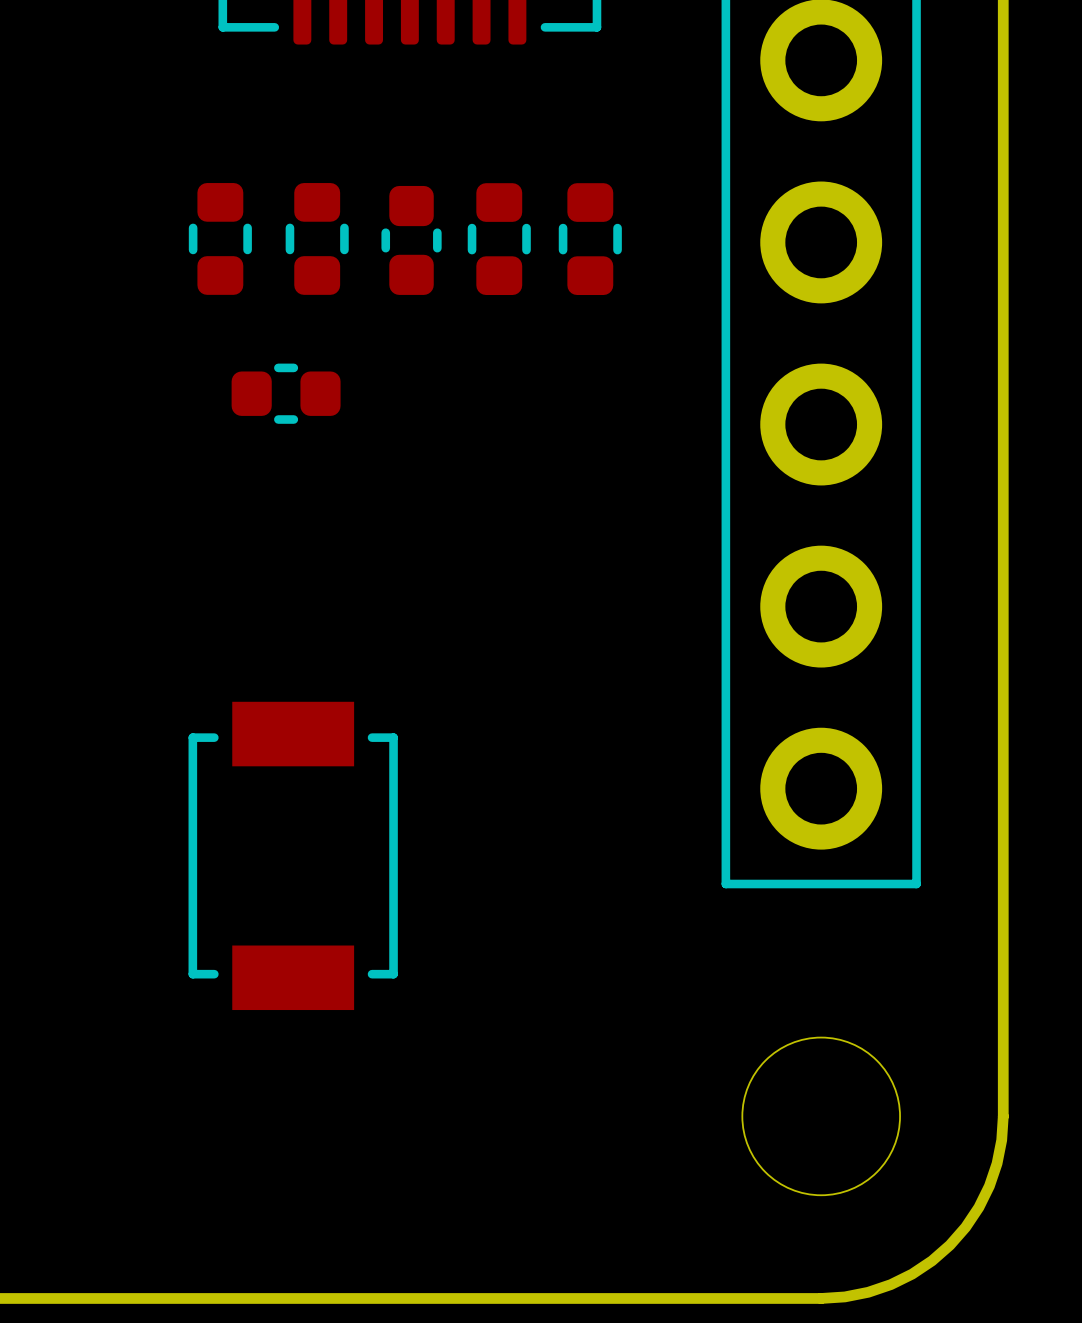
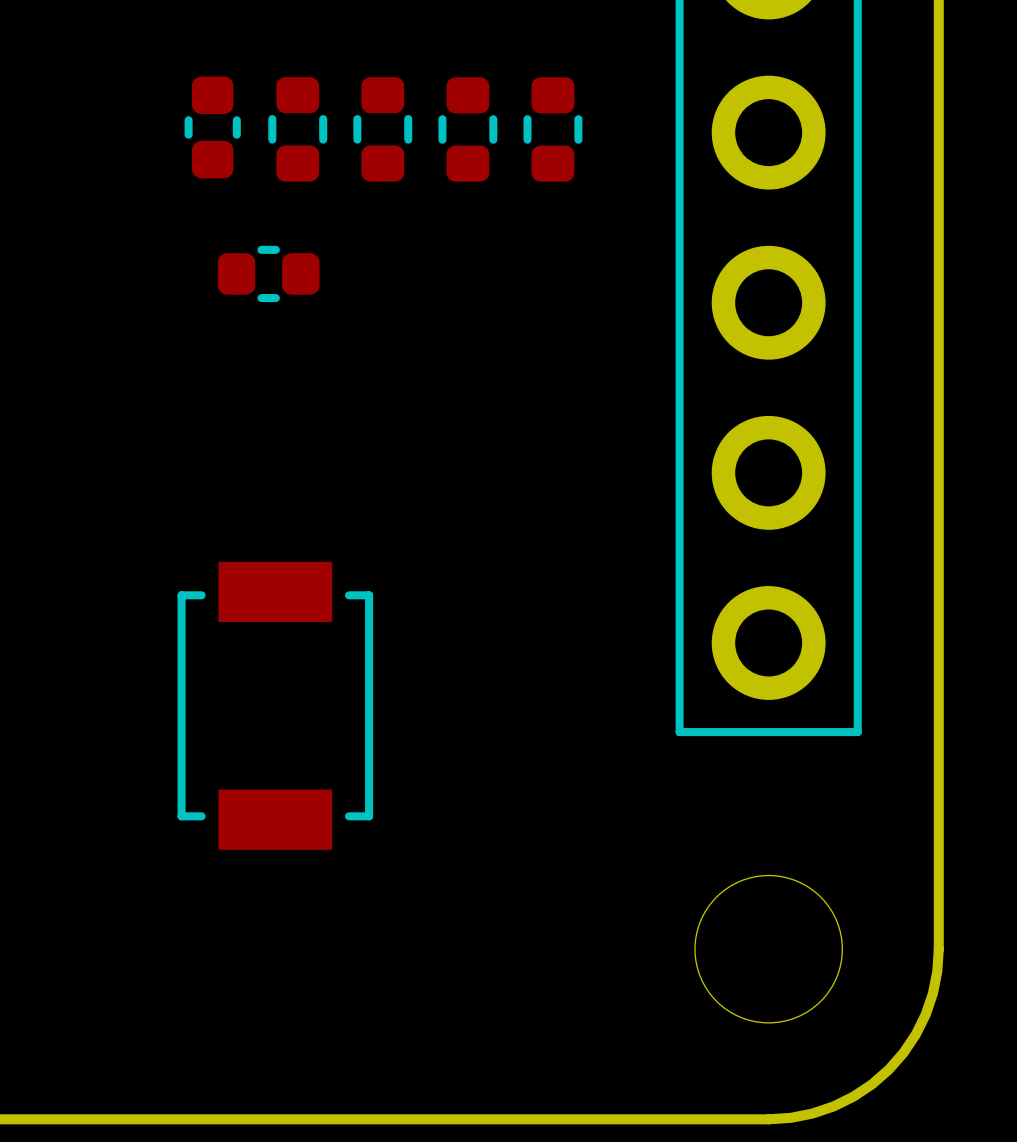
part footprint: [188, 183, 252, 295] -> [184, 76, 241, 179]
part footprint: [381, 185, 442, 295] -> [353, 77, 413, 182]

